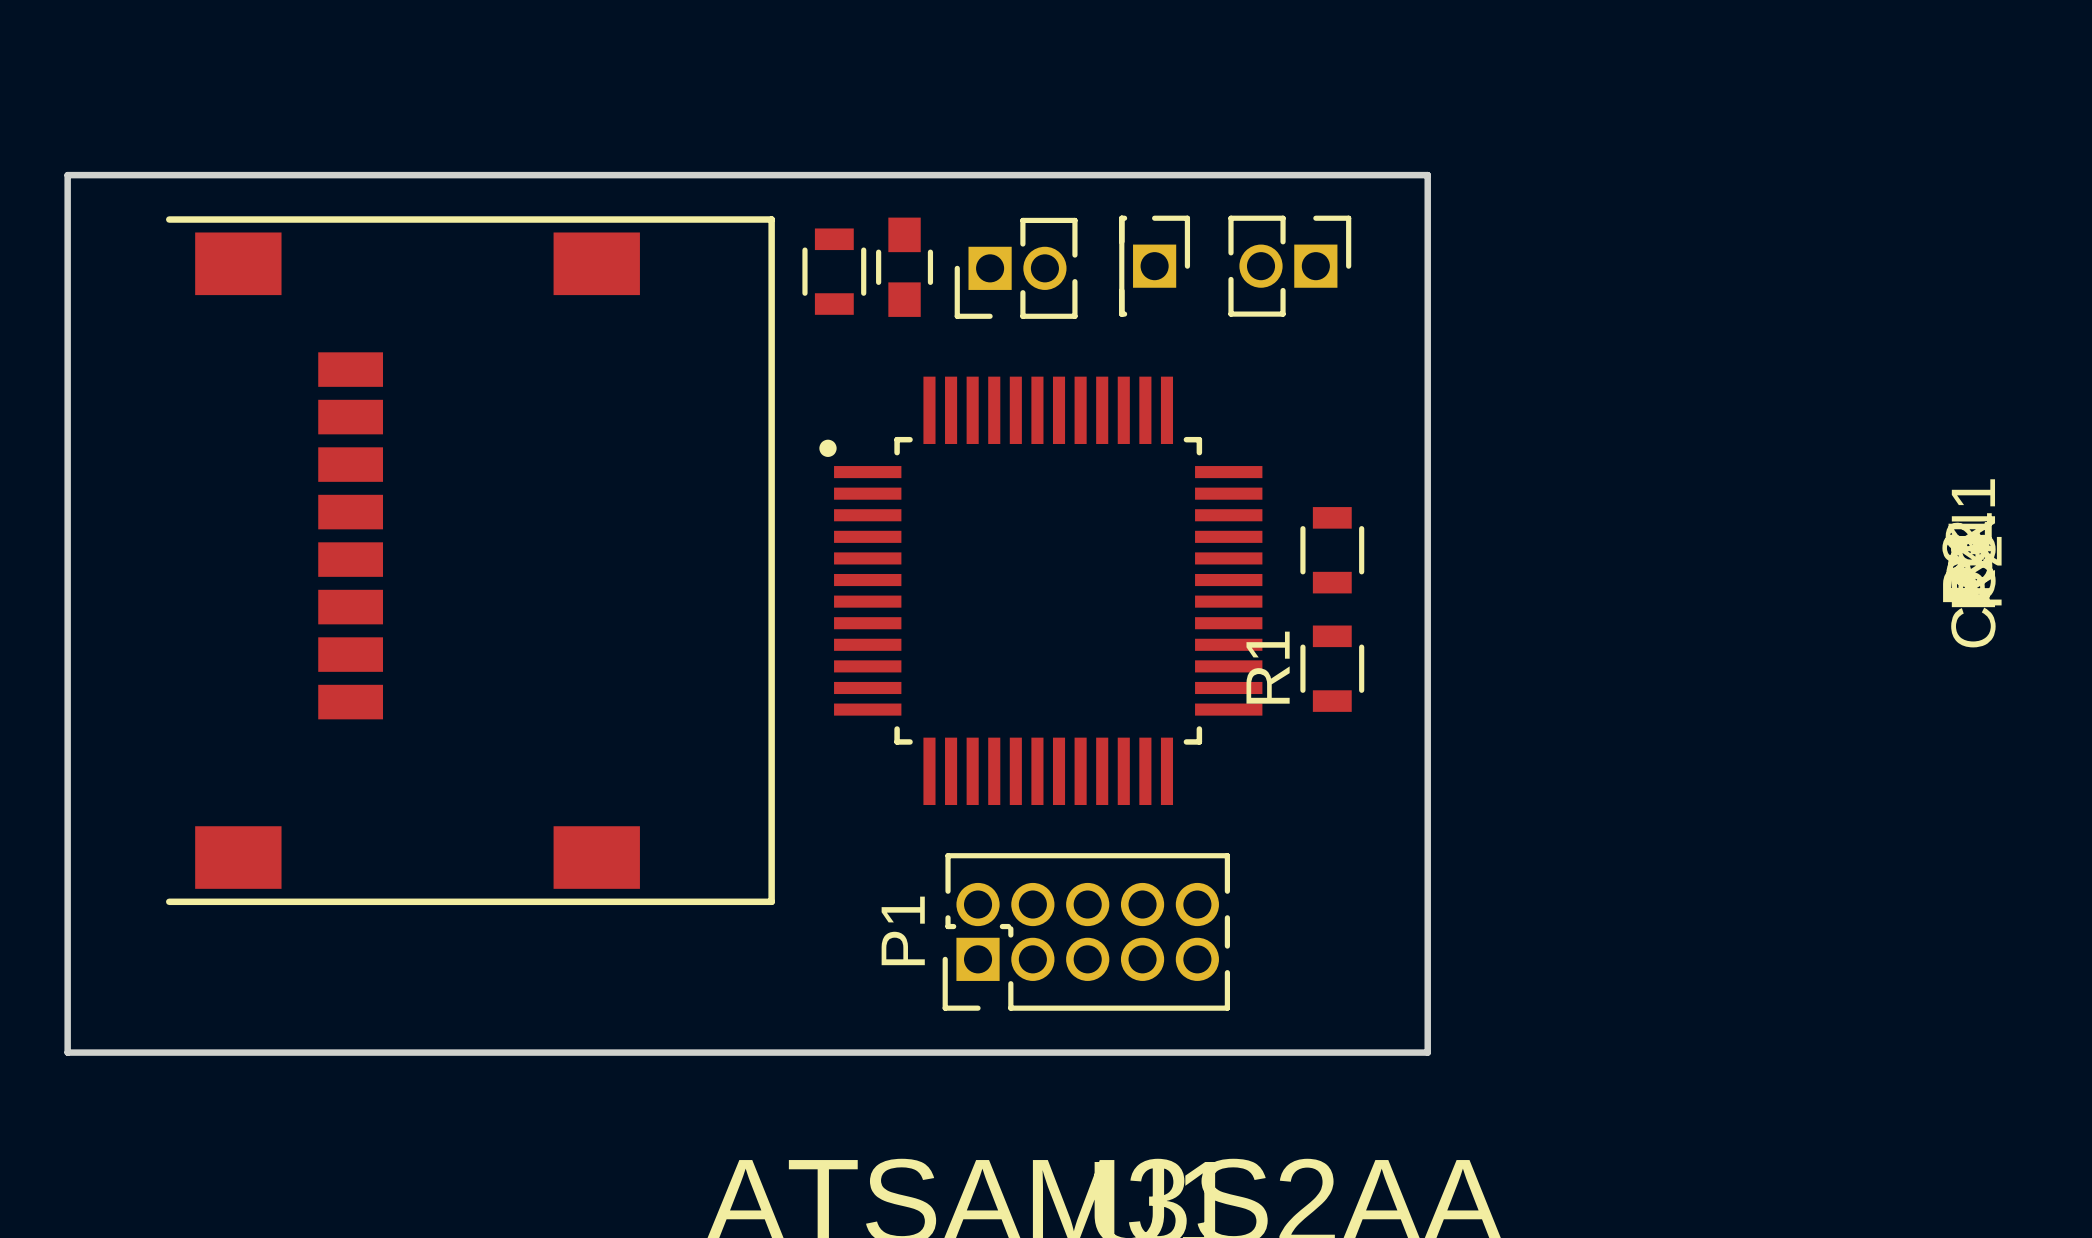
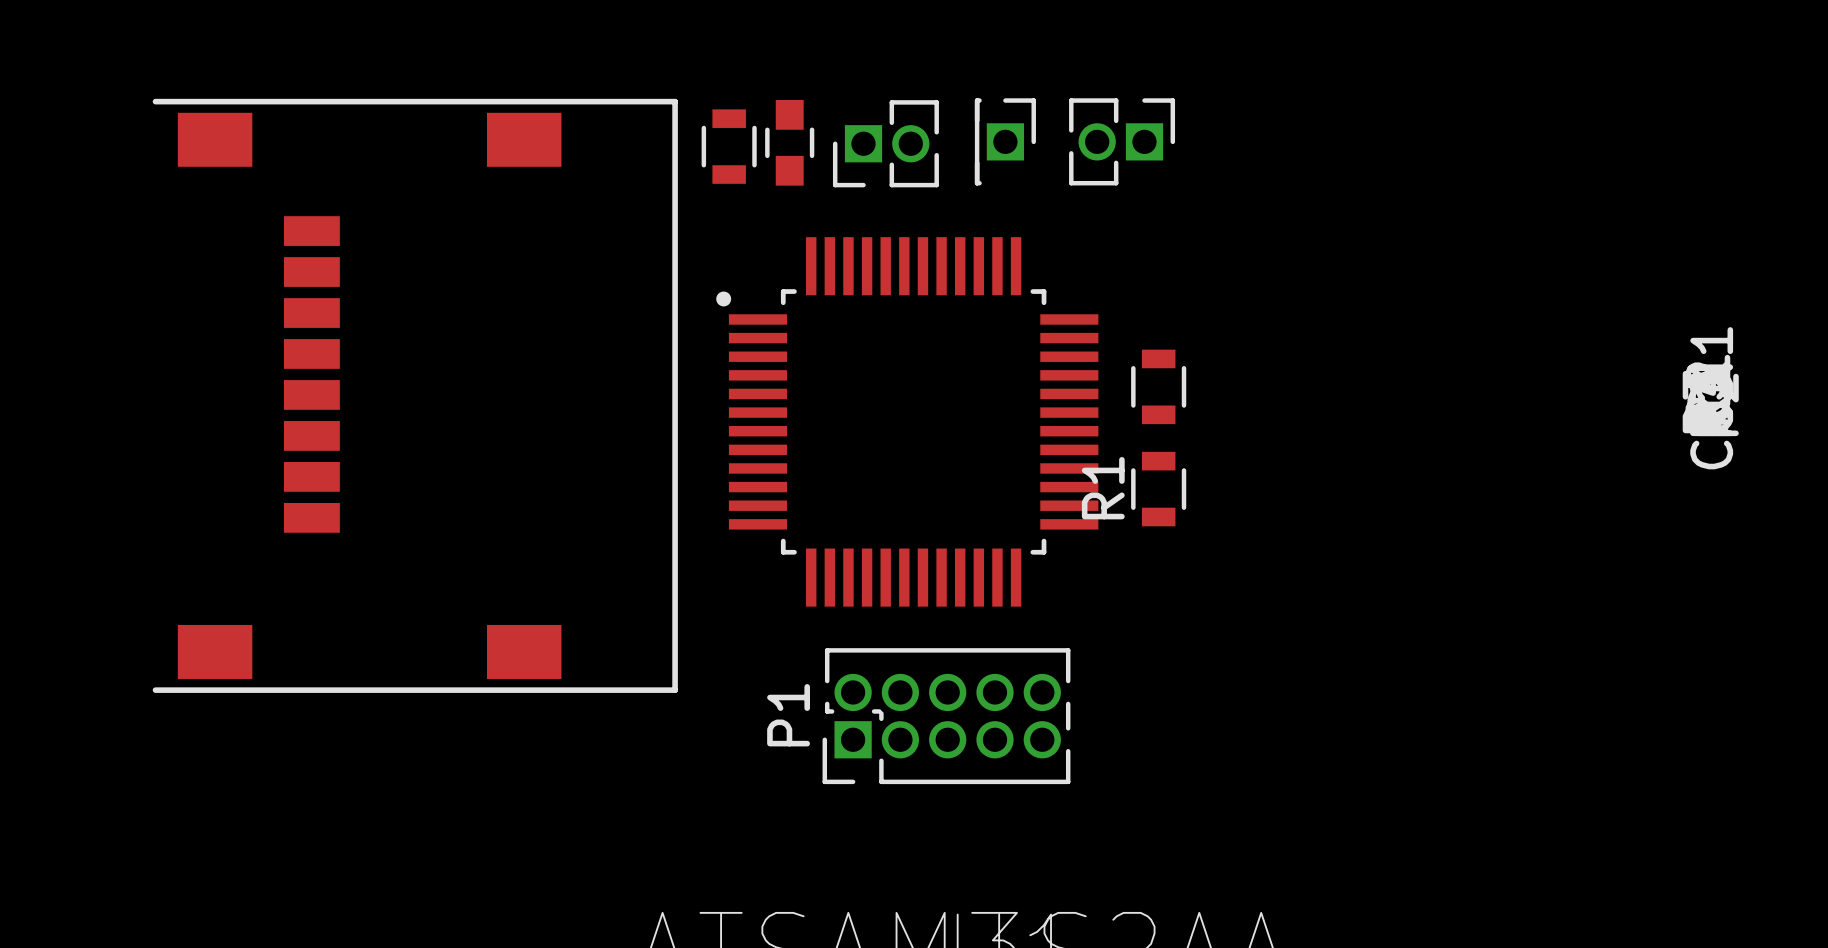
board edge: (67, 175) (1427, 175) (1427, 1052) (67, 1052) (67, 175) -> none

